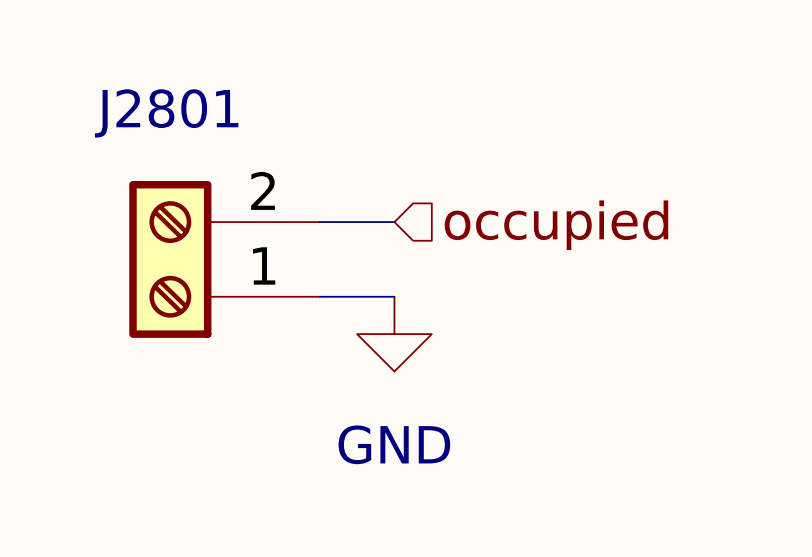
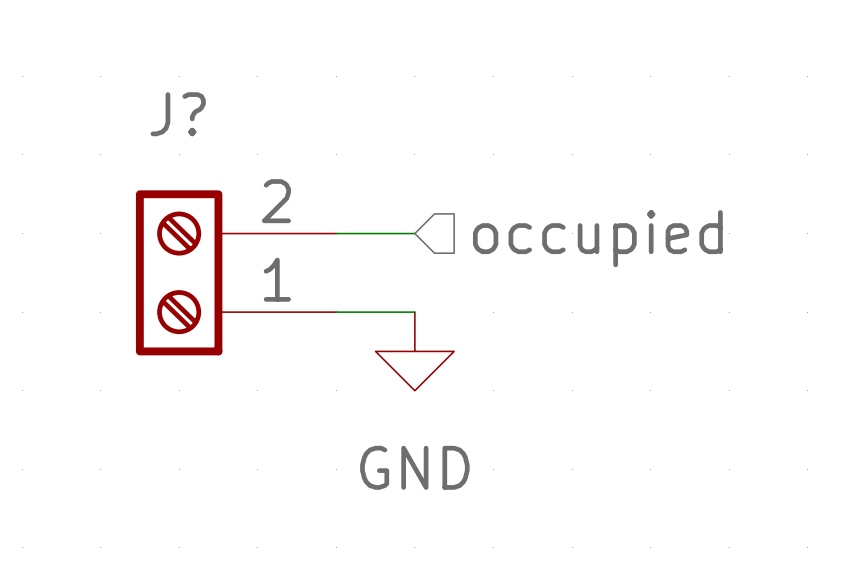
J2801 name: J2801 (166, 113) -> J? (178, 114)

